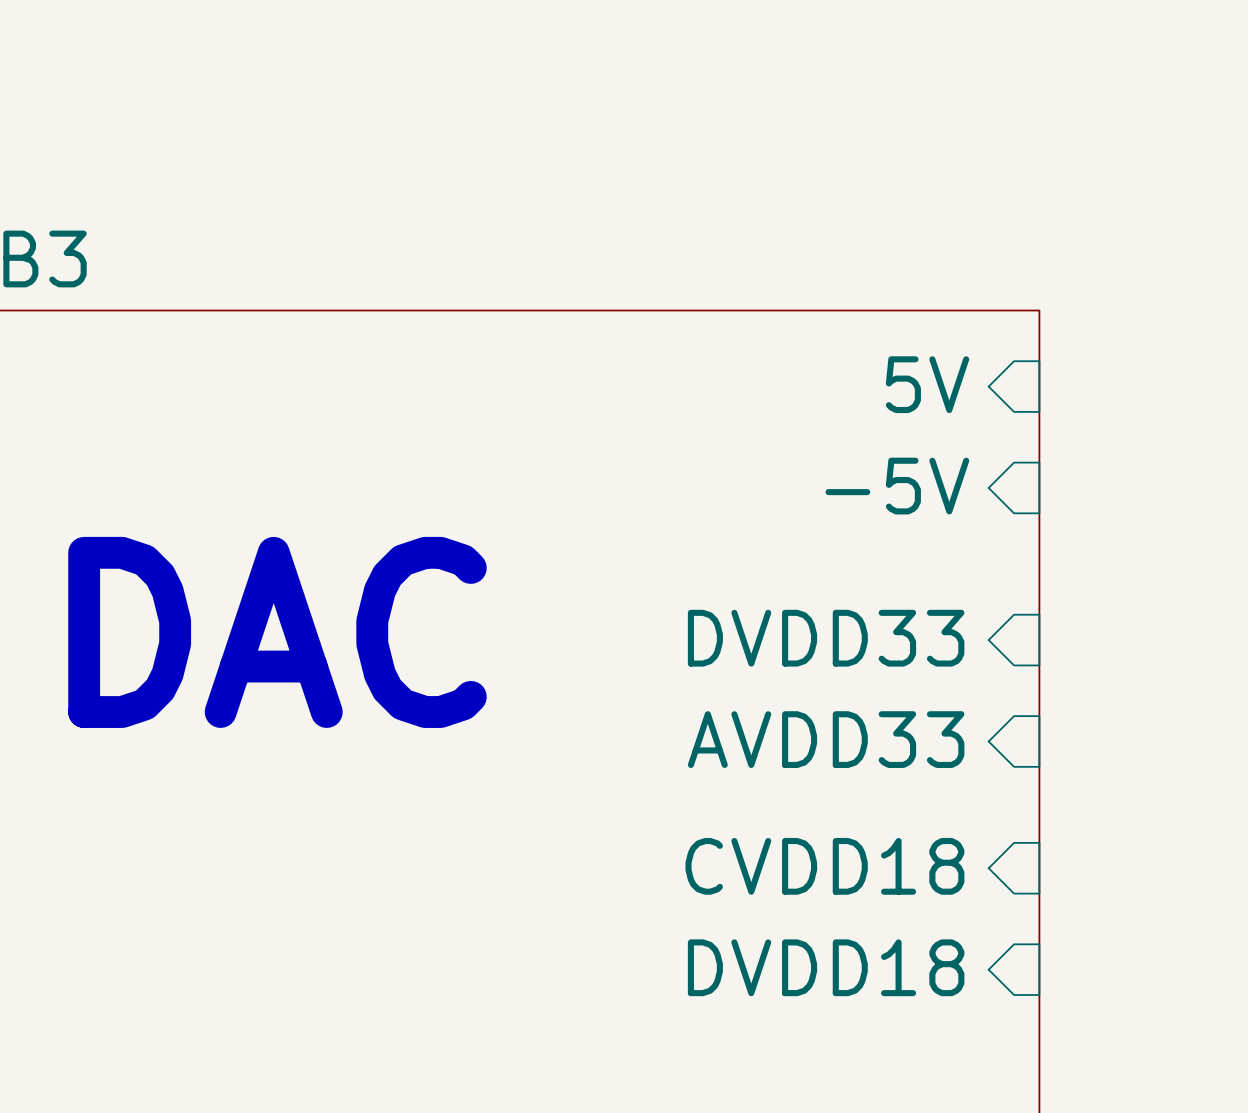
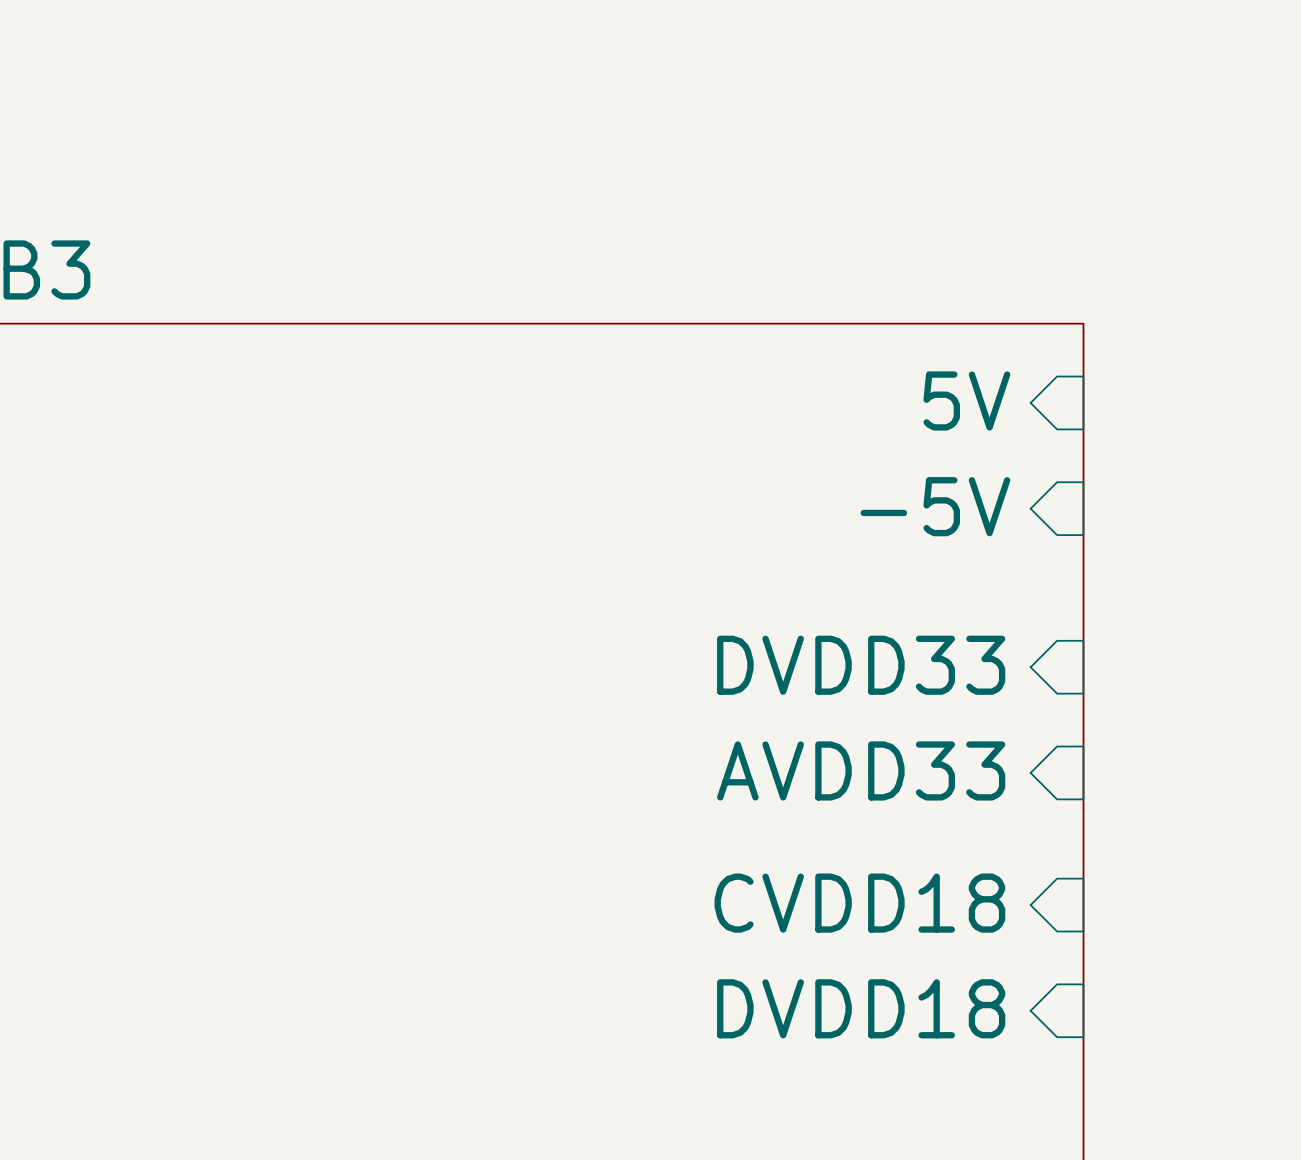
text: DAC (277, 632) -> none

